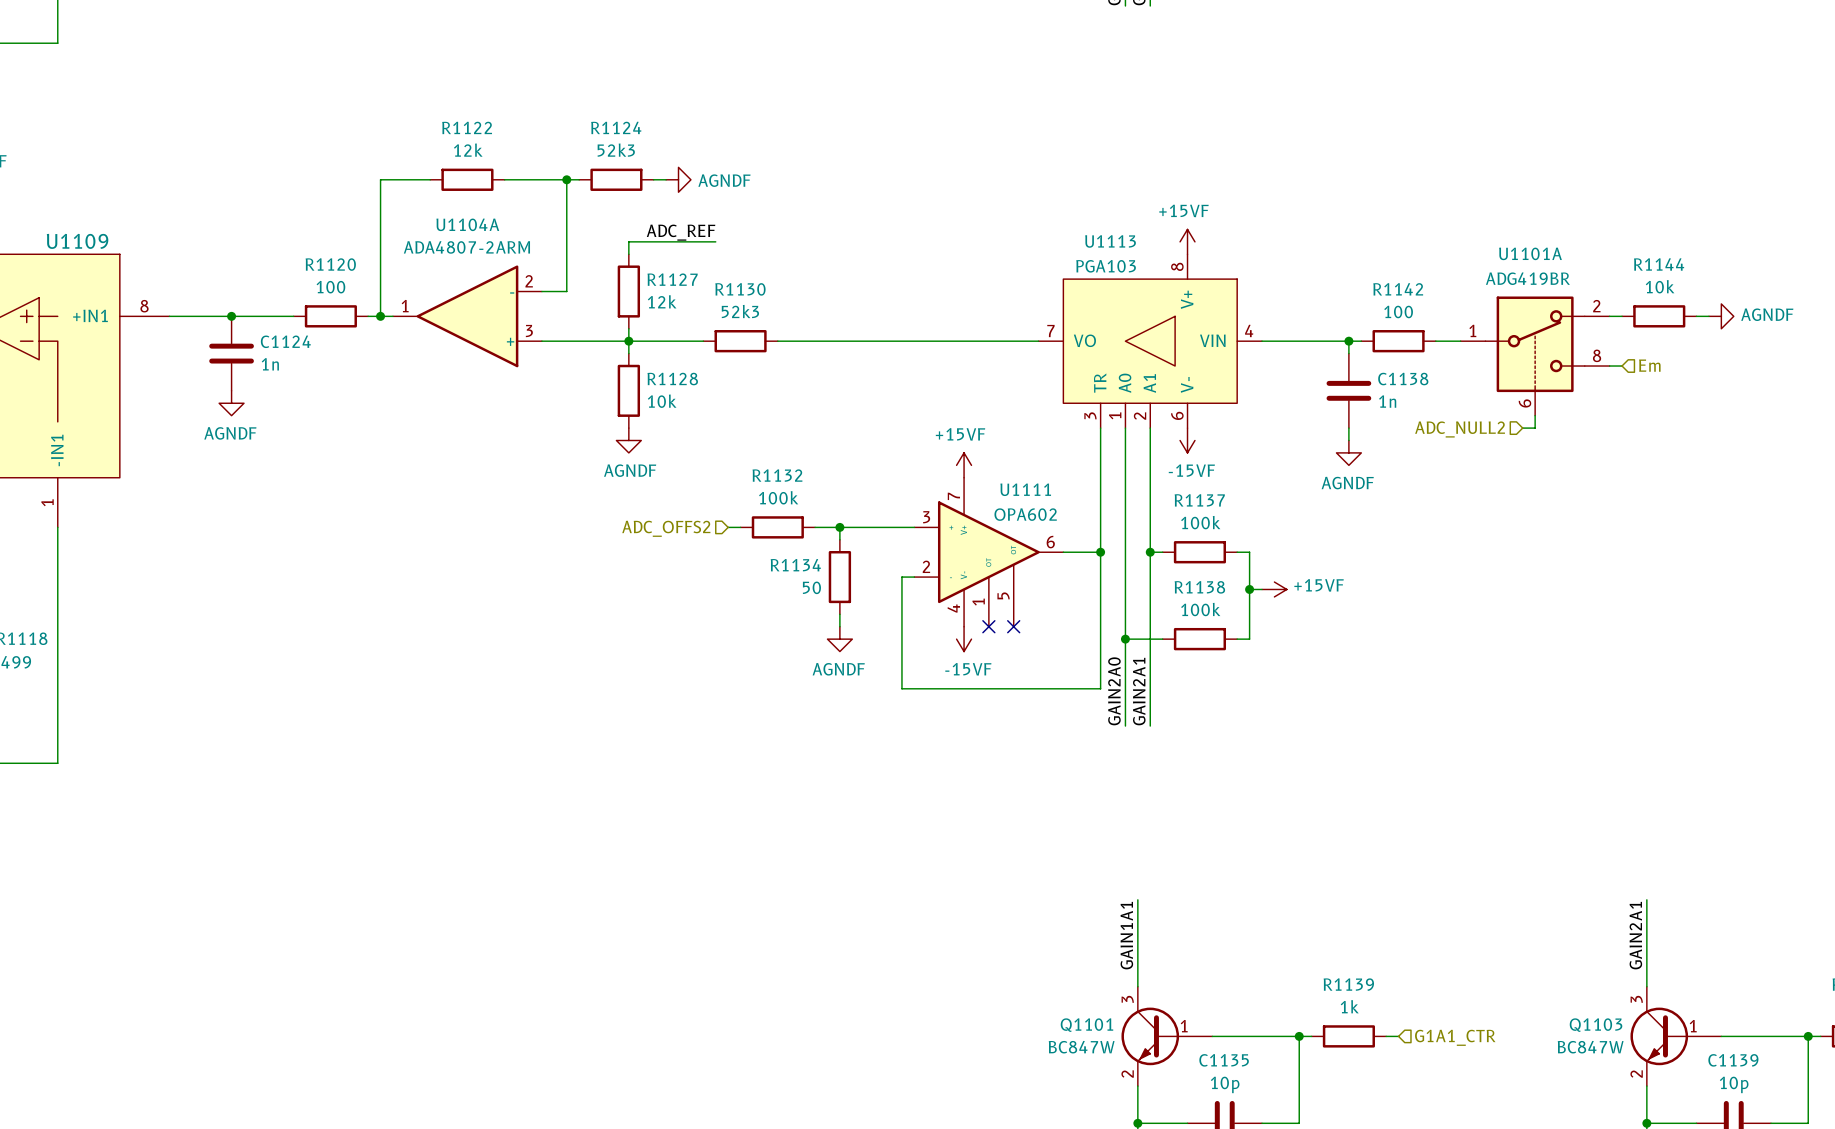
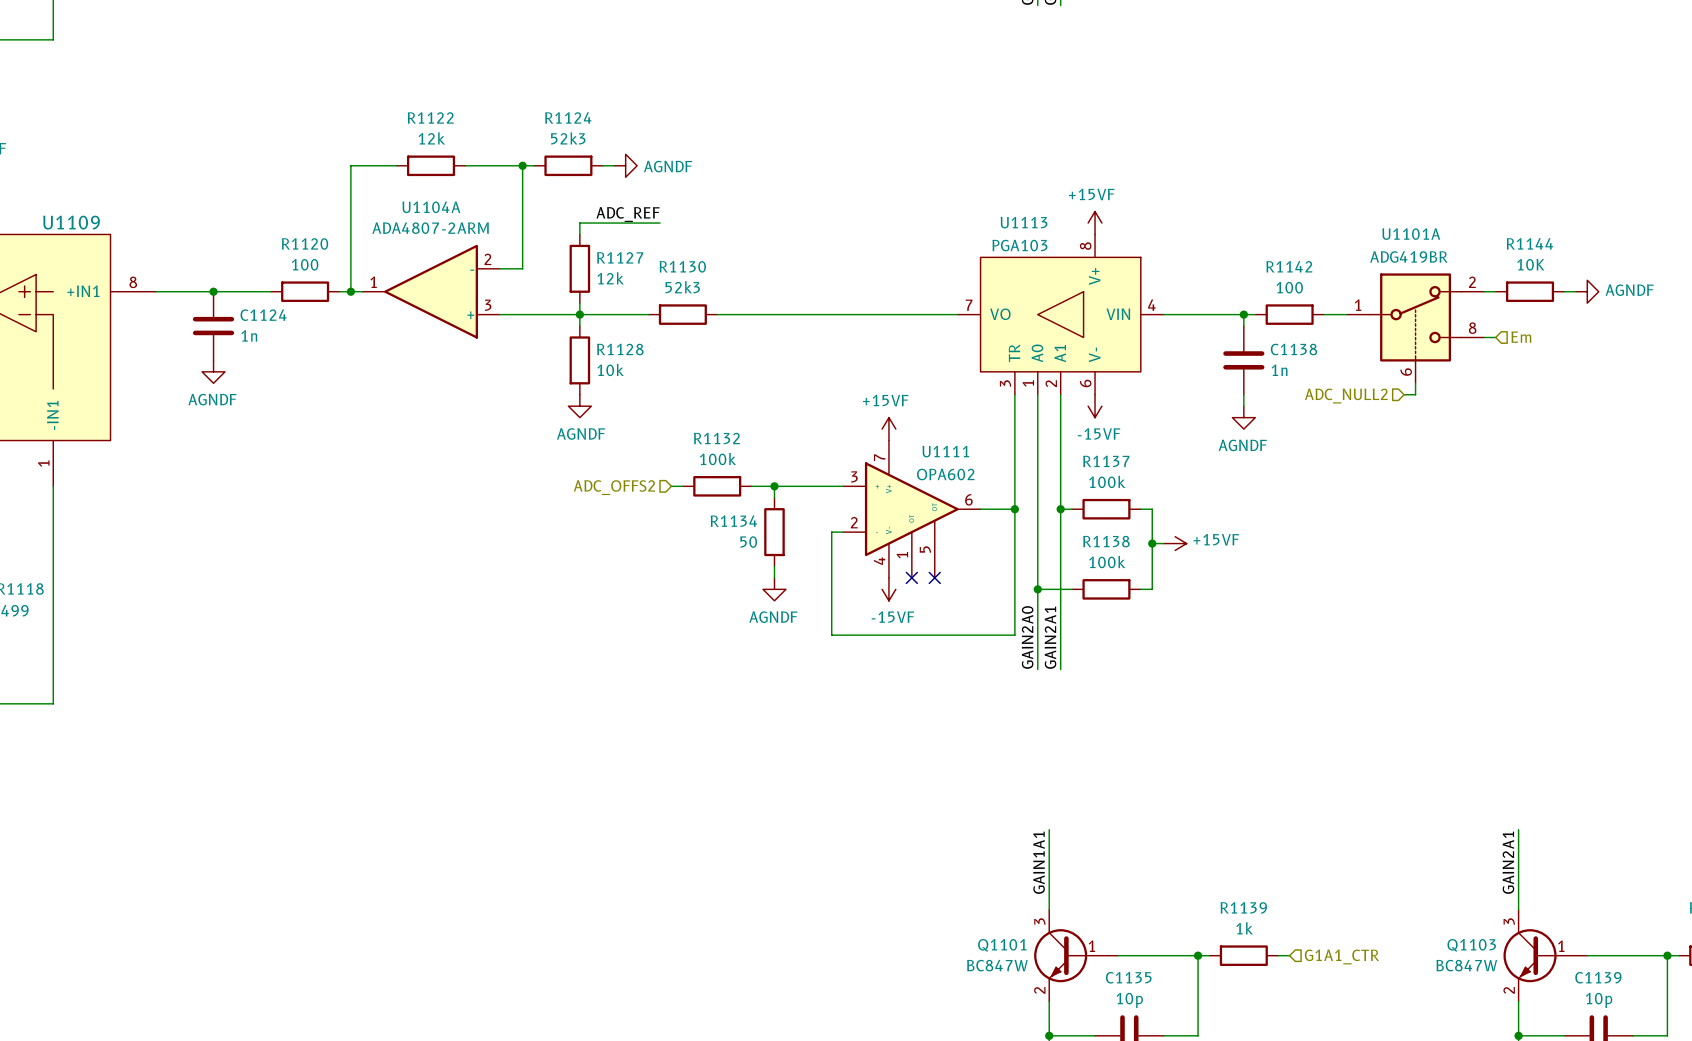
R1144 value: 10k (1660, 286) -> 10K (1530, 264)

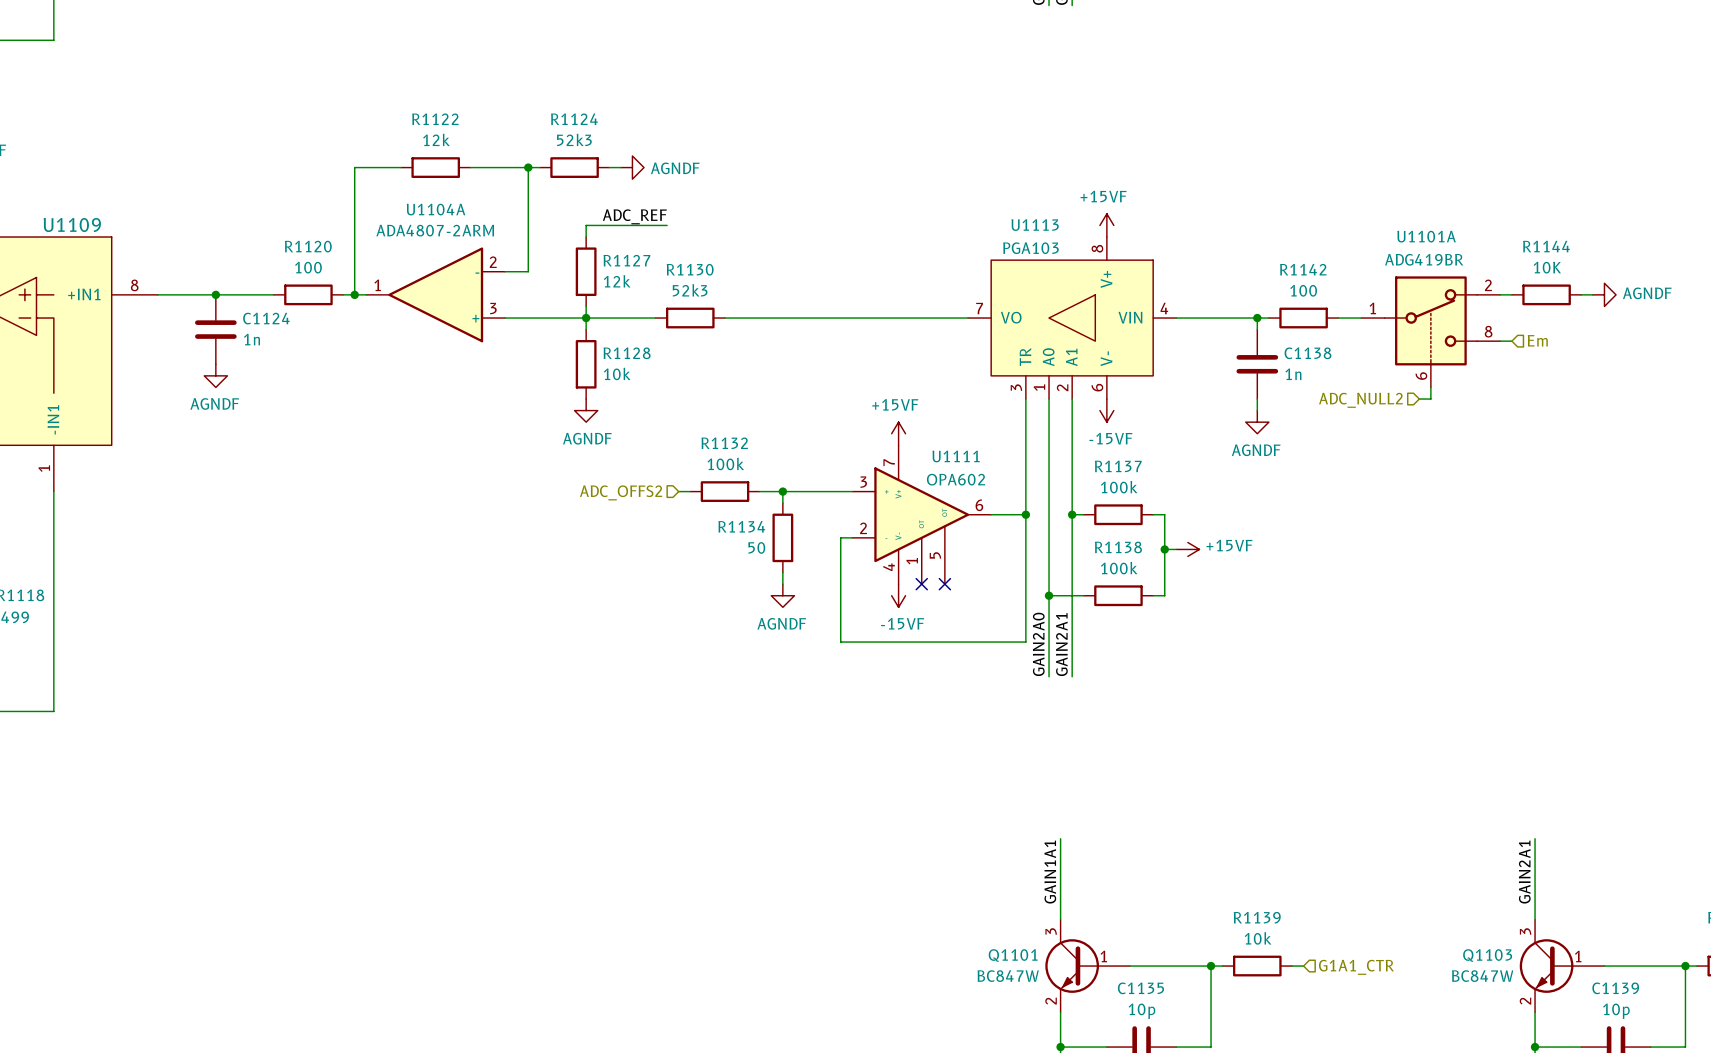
R1139 value: 1k (1244, 928) -> 10k (1258, 938)

